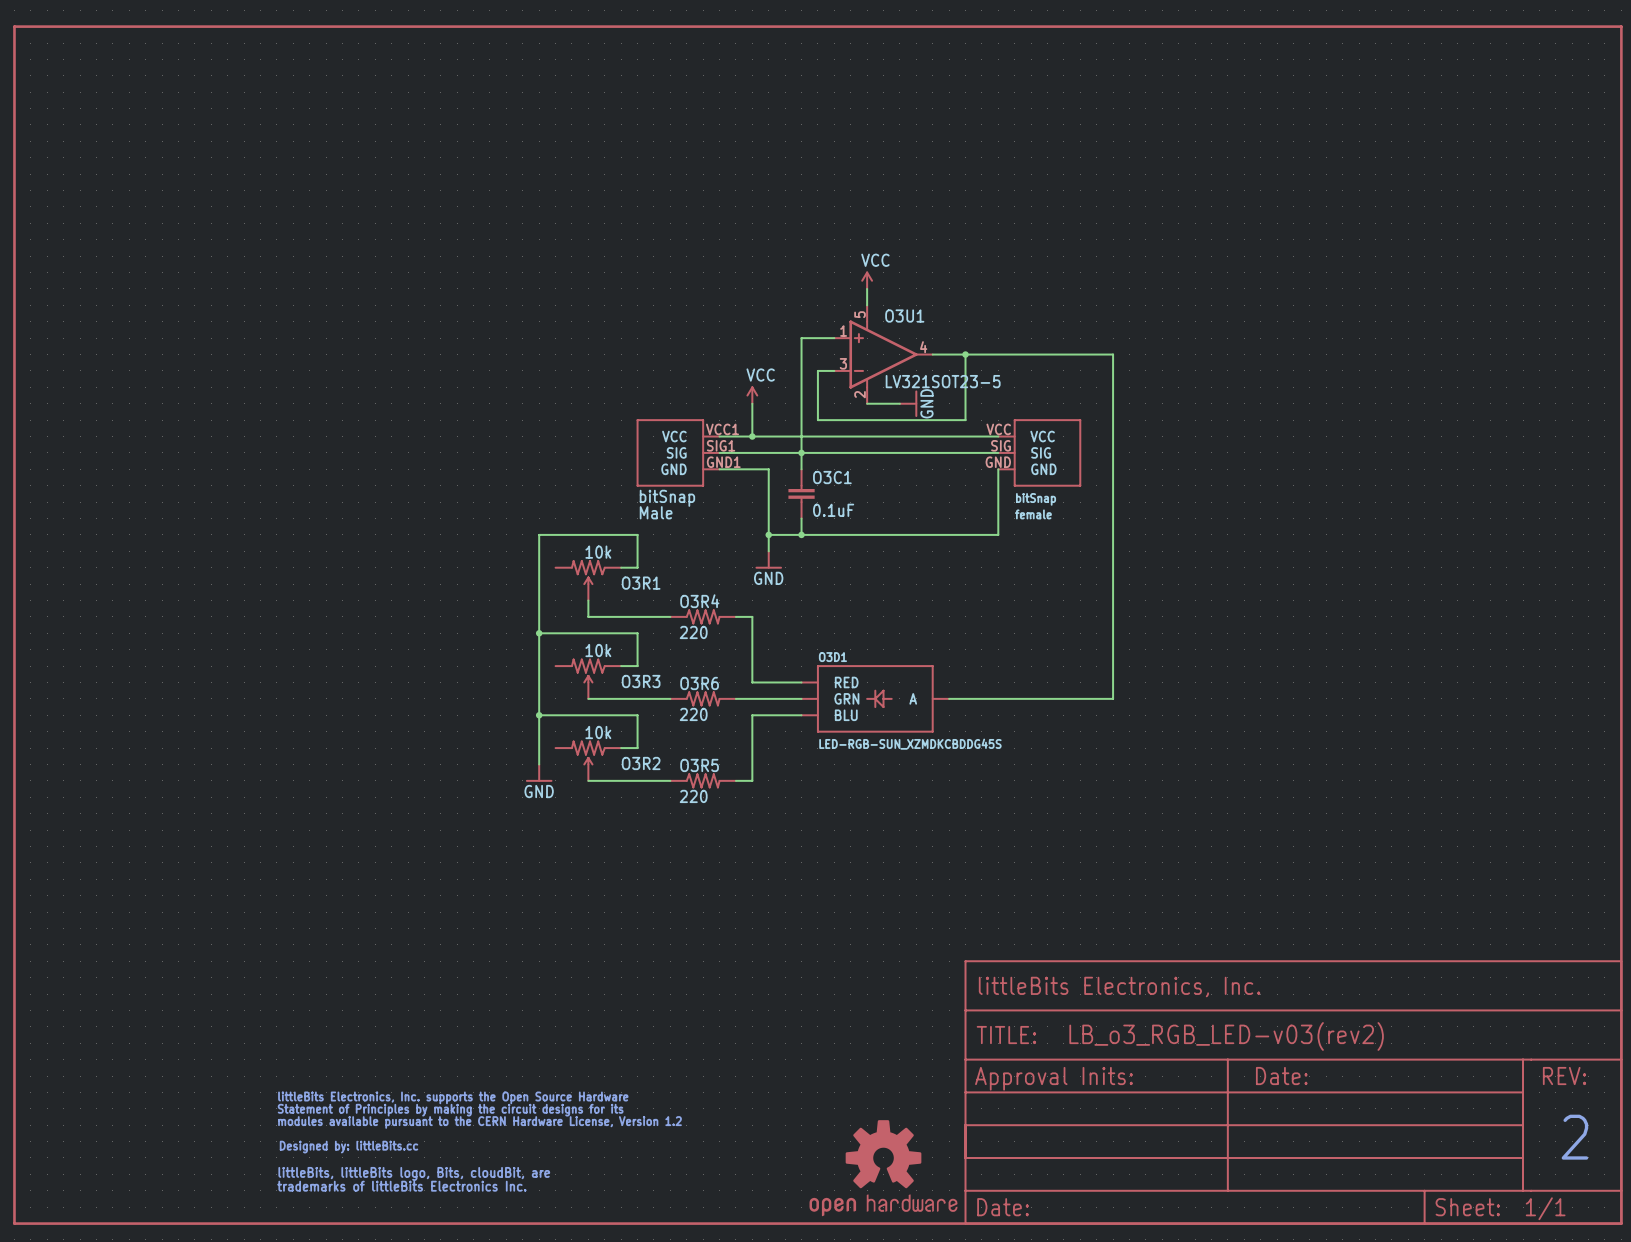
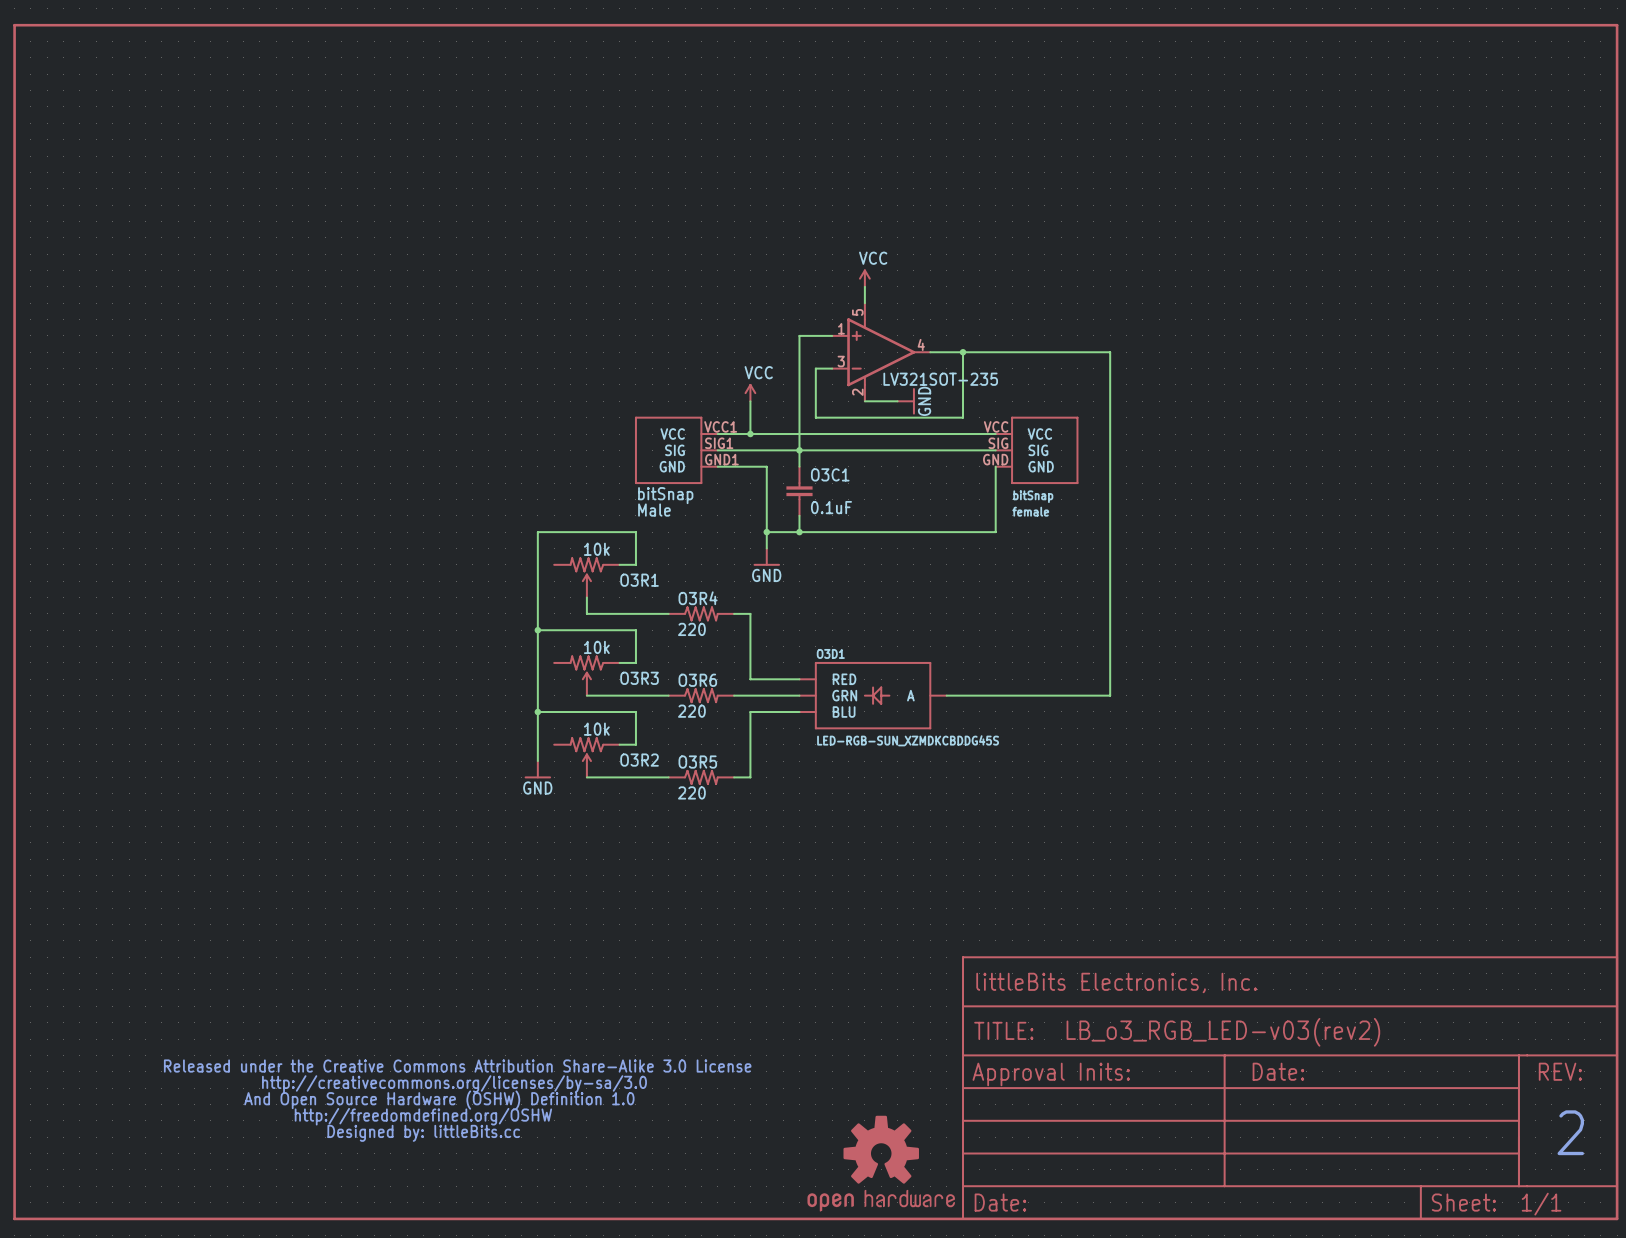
O3U1 name: O3U1 (904, 316) -> none
O3U1 value: LV321SOT23-5 (943, 381) -> LV321SOT-235 (940, 379)
part: none -> (457, 1100)
part: (479, 1141) -> none

